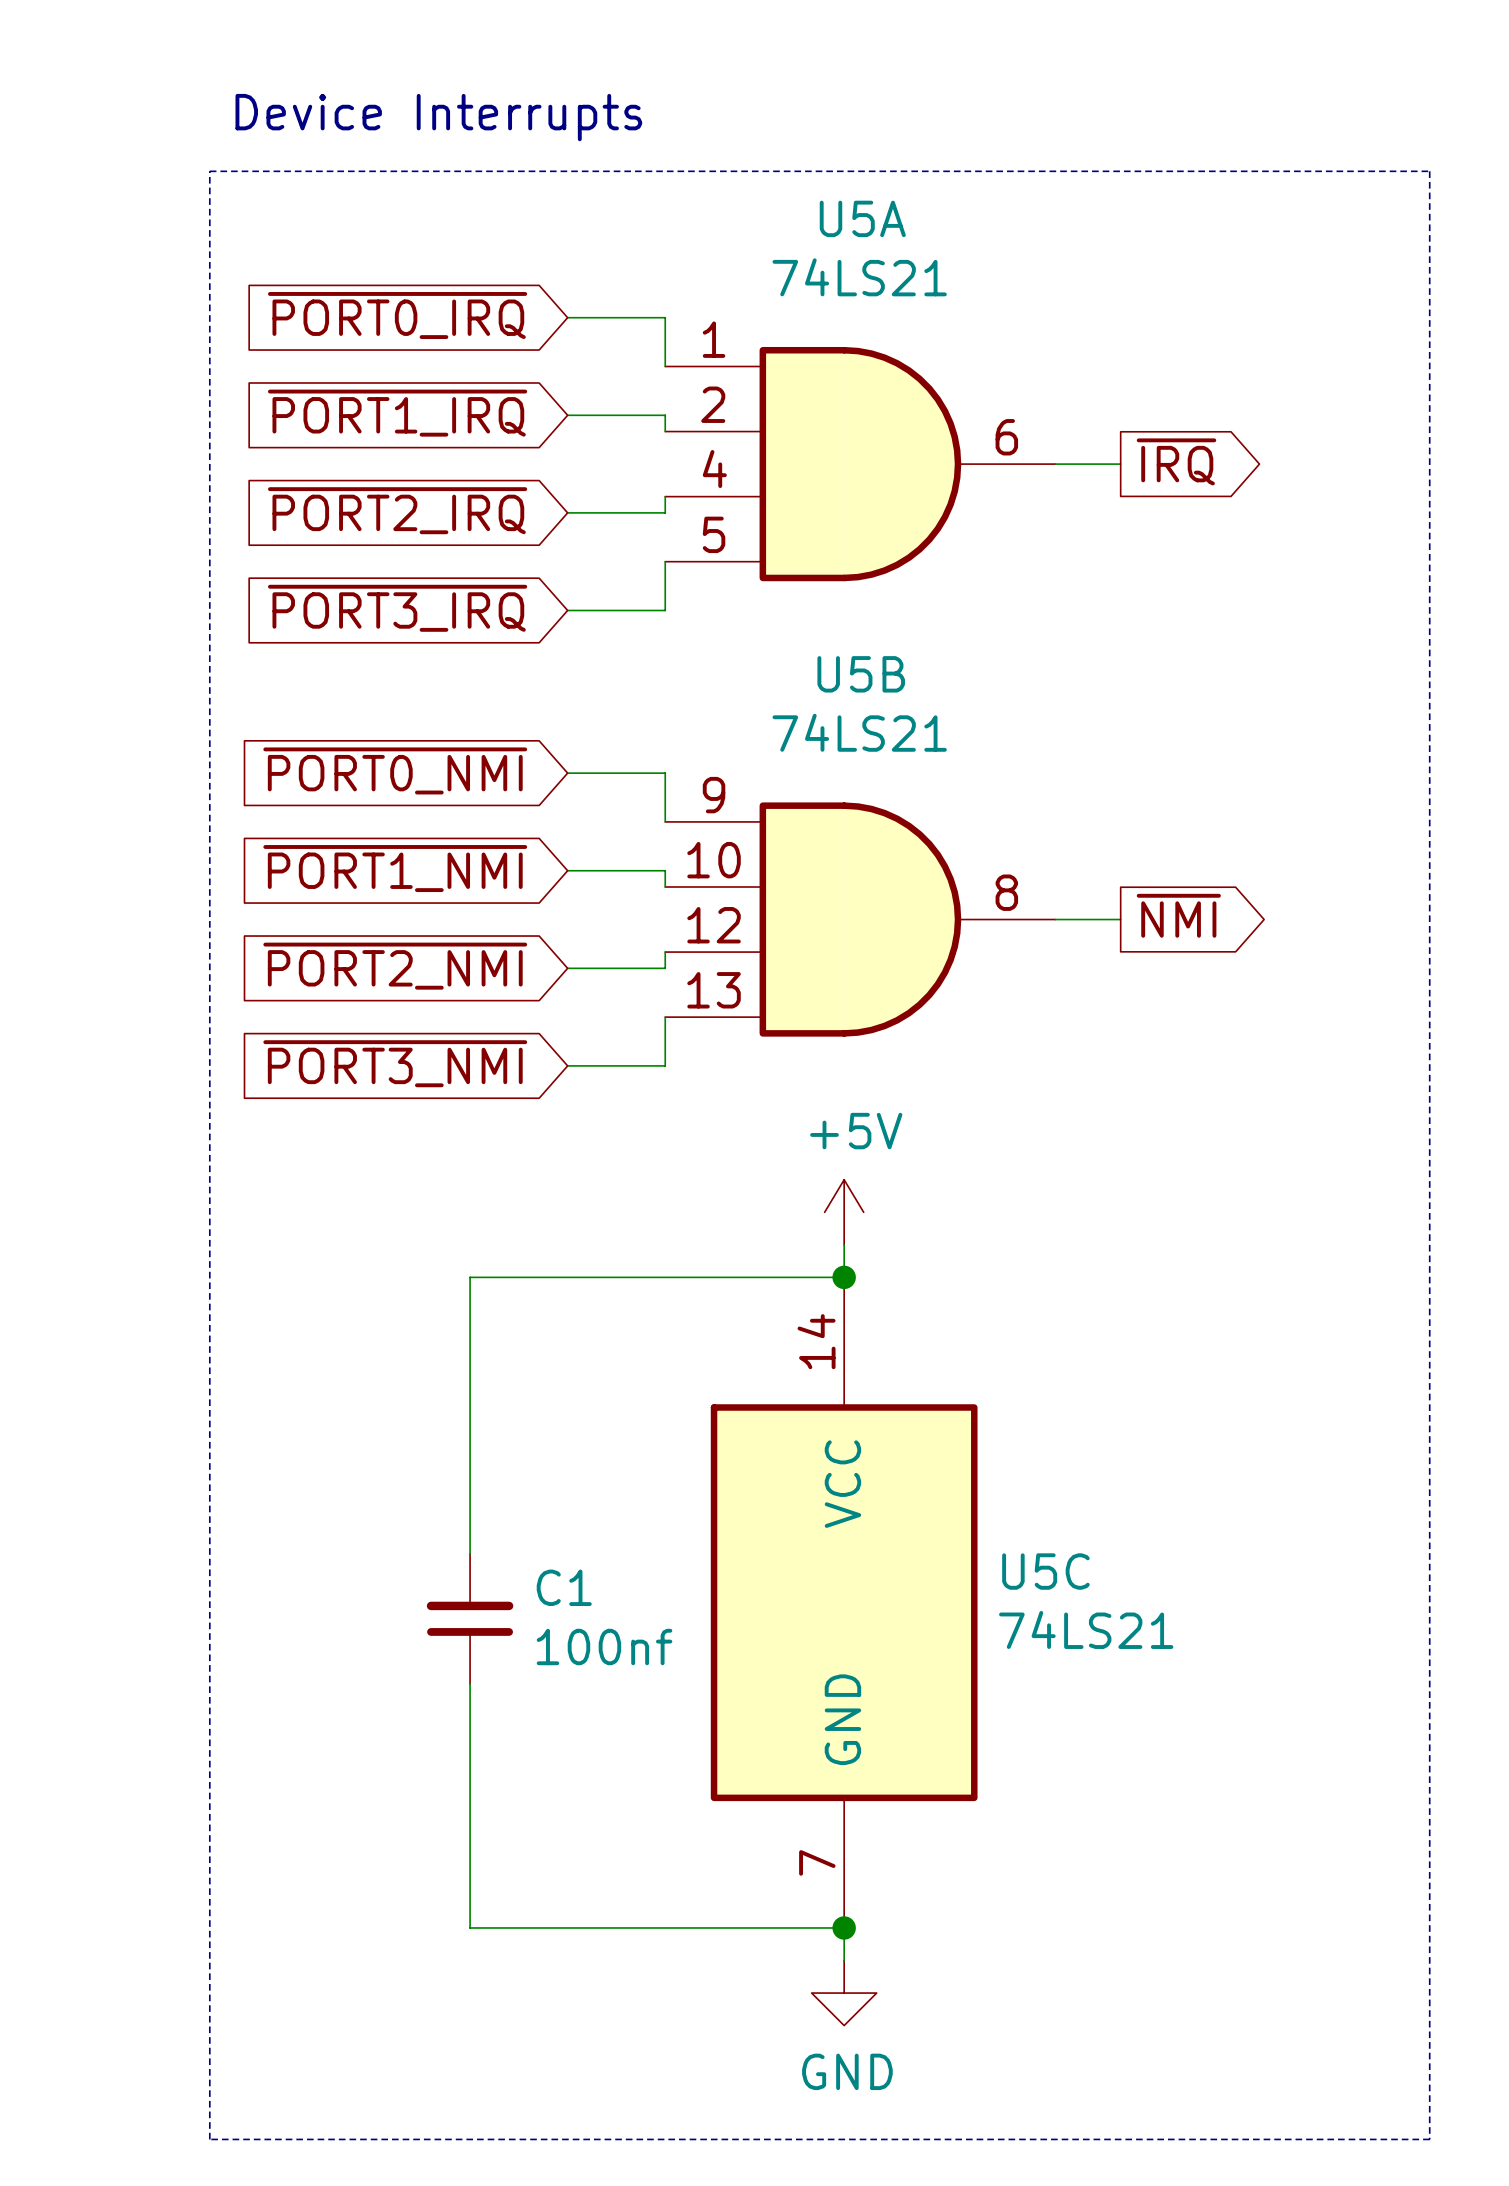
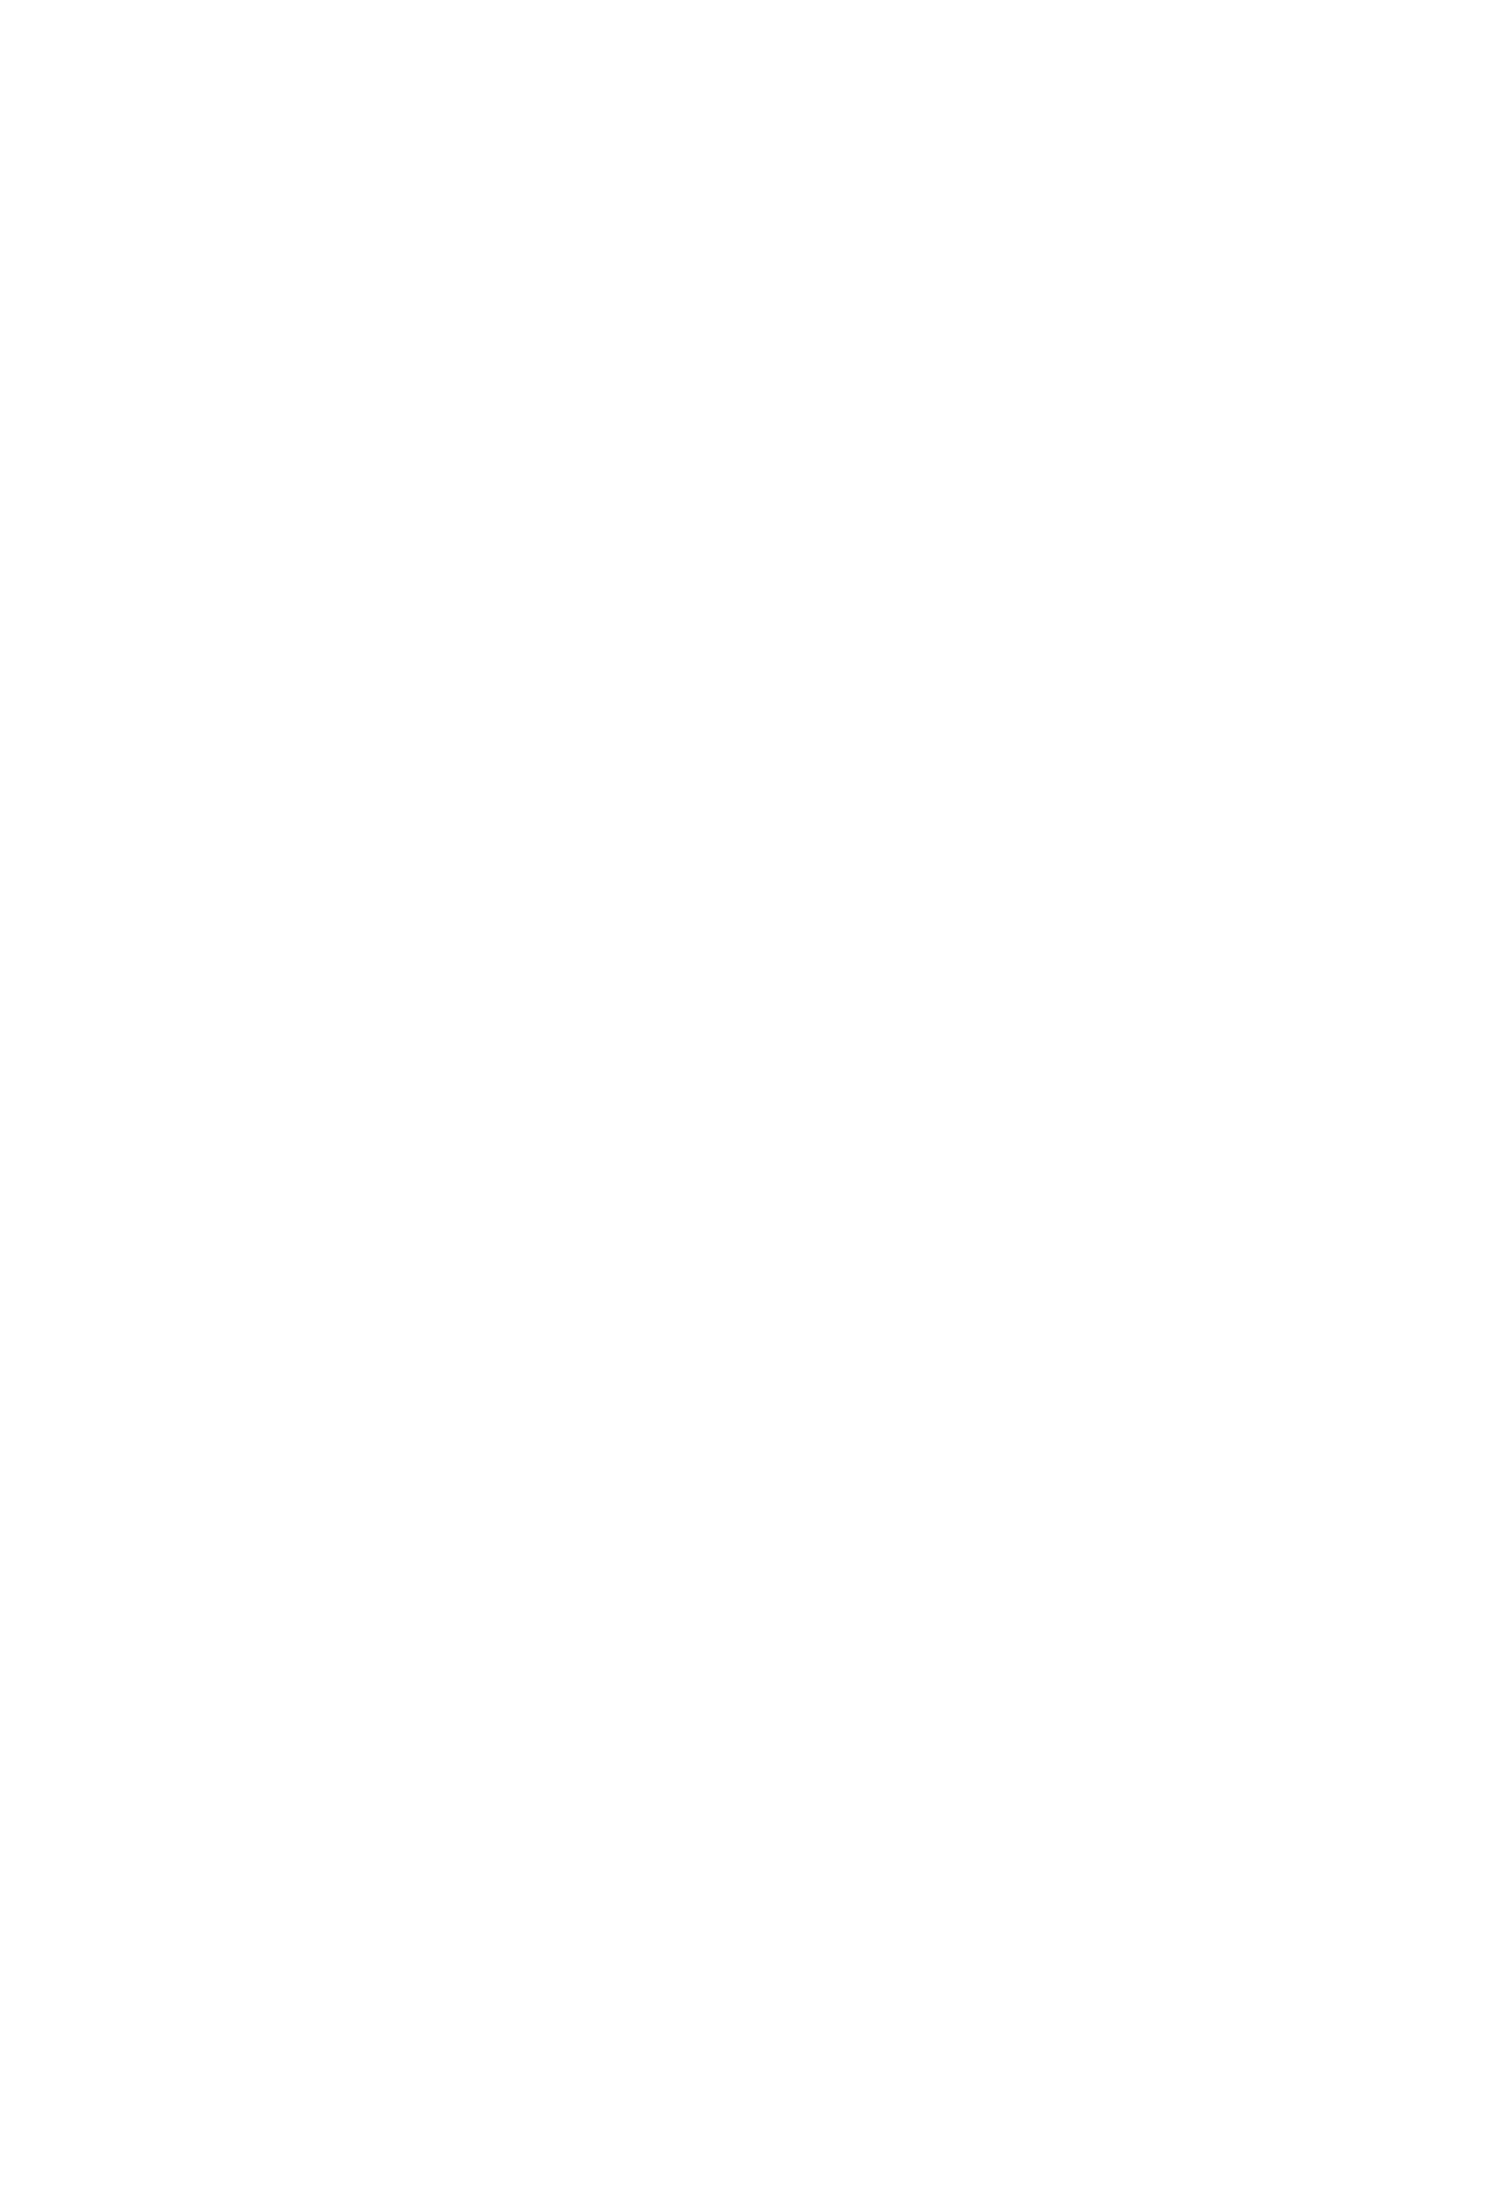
text: Device Interrupts (438, 117) -> none
line: (209, 171) (209, 2139) (1429, 2139) (1429, 171) (209, 171) -> none
global label: ~{PORT0_IRQ} (397, 315) -> none
wire: (567, 317) (665, 317) (665, 366) -> none
global label: ~{PORT1_IRQ} (397, 413) -> none
wire: (567, 415) (665, 415) (665, 431) -> none
global label: ~{IRQ} (1176, 461) -> none
U5A: 74LS21 (860, 464) -> none
wire: (1055, 464) (1120, 464) -> none
wire: (665, 496) (665, 512) (567, 512) -> none
global label: ~{PORT2_IRQ} (397, 510) -> none
wire: (665, 561) (665, 610) (567, 610) -> none
global label: ~{PORT3_IRQ} (397, 608) -> none
global label: ~{PORT0_NMI} (395, 770) -> none
wire: (567, 773) (665, 773) (665, 821) -> none
global label: ~{PORT1_NMI} (395, 868) -> none
wire: (567, 870) (665, 870) (665, 887) -> none
global label: ~{NMI} (1178, 915) -> none
U5B: 74LS21 (860, 919) -> none
wire: (1055, 919) (1120, 919) -> none
wire: (665, 952) (665, 968) (567, 968) -> none
global label: ~{PORT2_NMI} (395, 966) -> none
wire: (665, 1017) (665, 1065) (567, 1065) -> none
global label: ~{PORT3_NMI} (395, 1063) -> none
power symbol: +5V (844, 1212) -> none
wire: (844, 1244) (844, 1277) (470, 1277) (470, 1553) -> none
junction: (844, 1277) -> none
U5C: 74LS21 (844, 1602) -> none
C1: 100nf (470, 1618) -> none
wire: (470, 1684) (470, 1927) (844, 1927) (844, 1960) -> none
junction: (844, 1927) -> none
power symbol: GND (844, 1993) -> none

